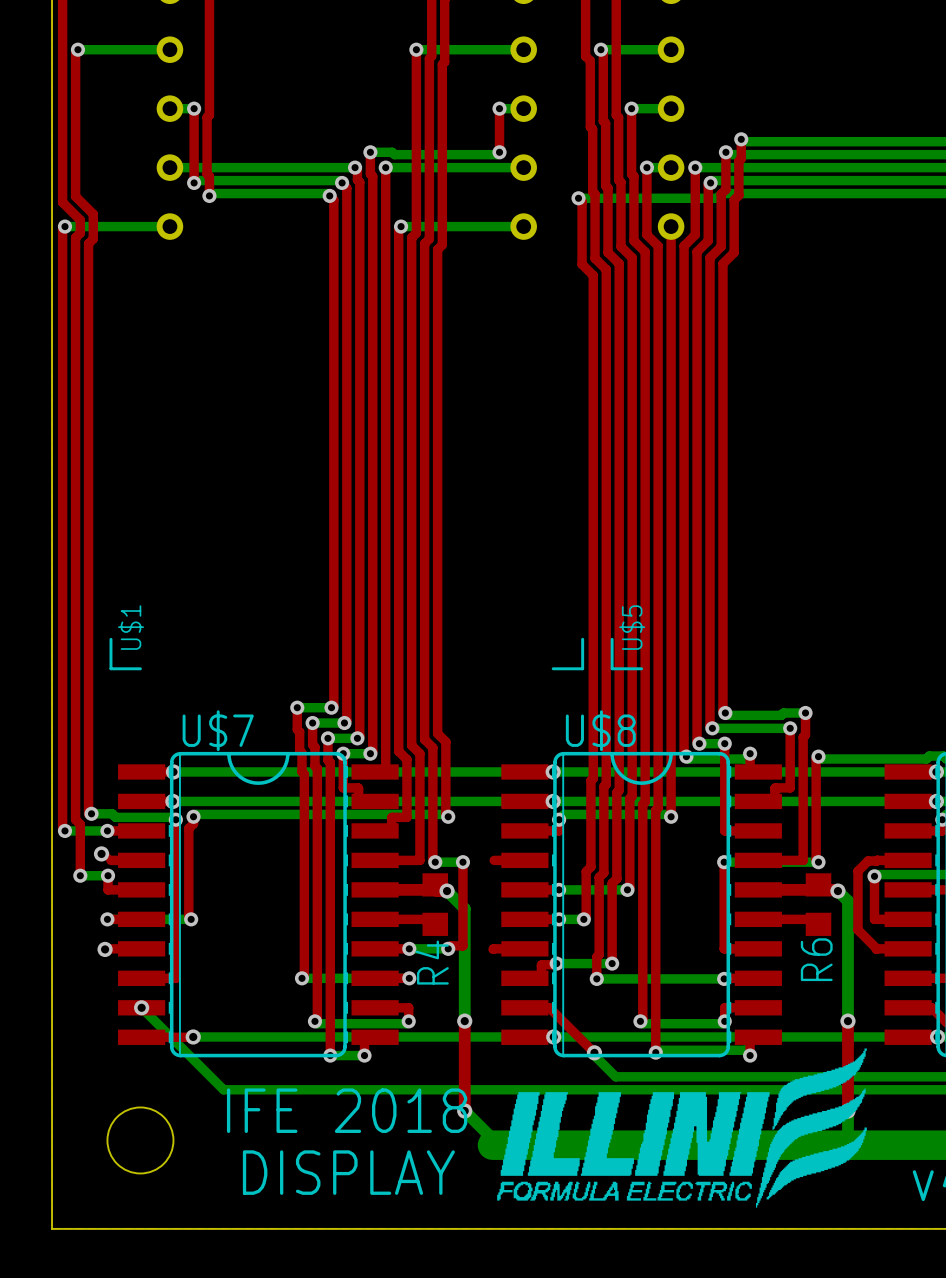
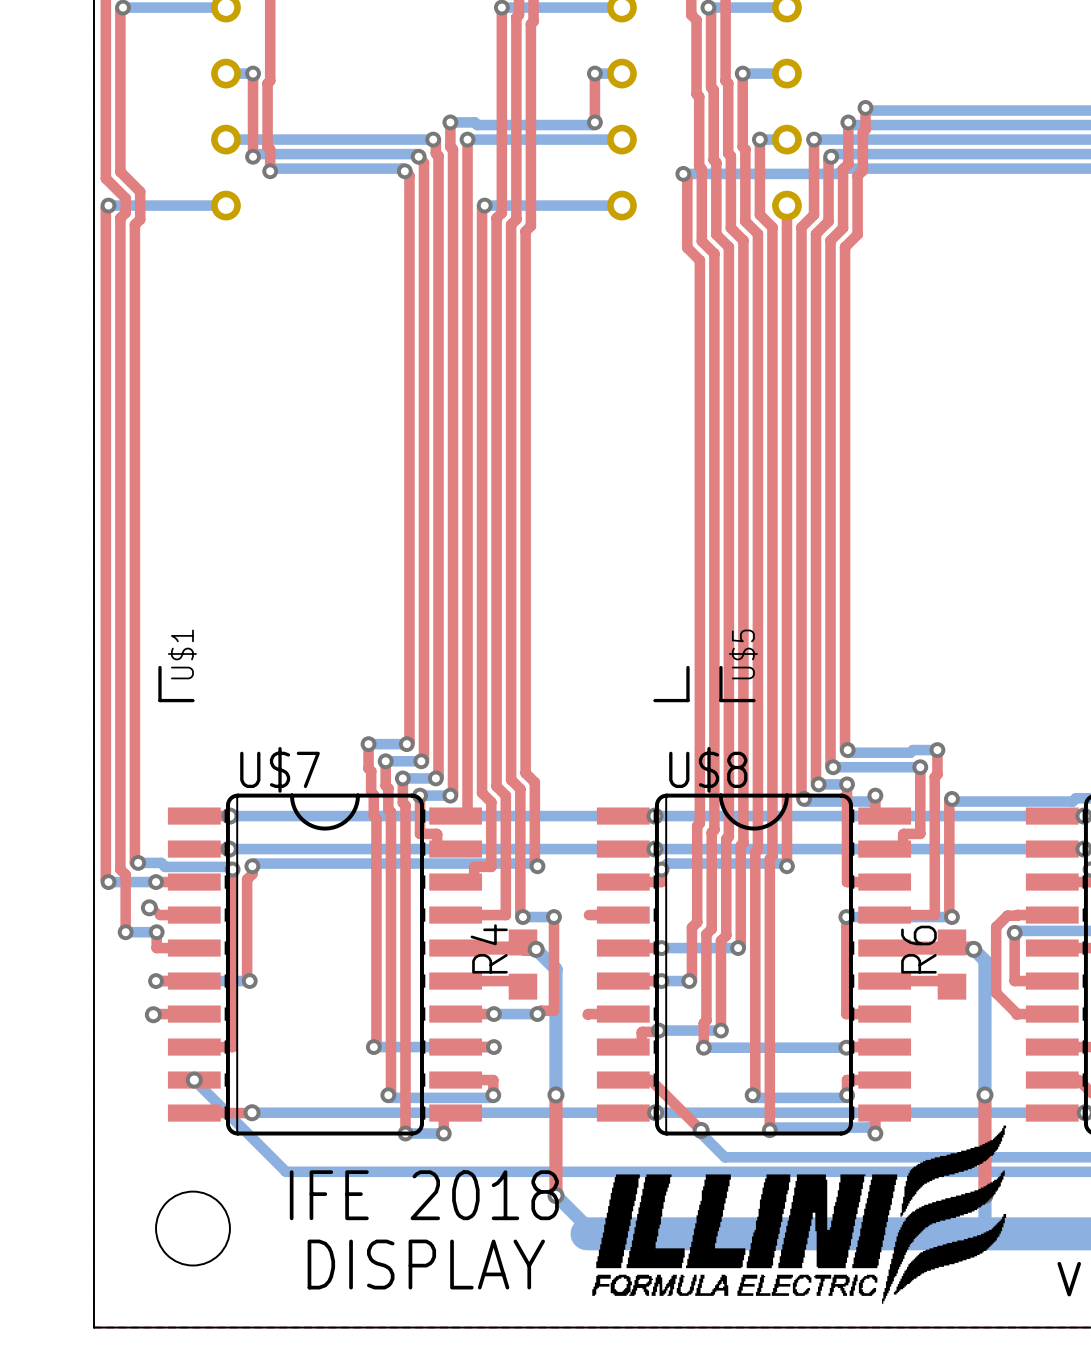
R6 name position: R6 (816, 959) -> R6 (918, 949)
R4 name position: R4 (432, 962) -> R4 (489, 948)

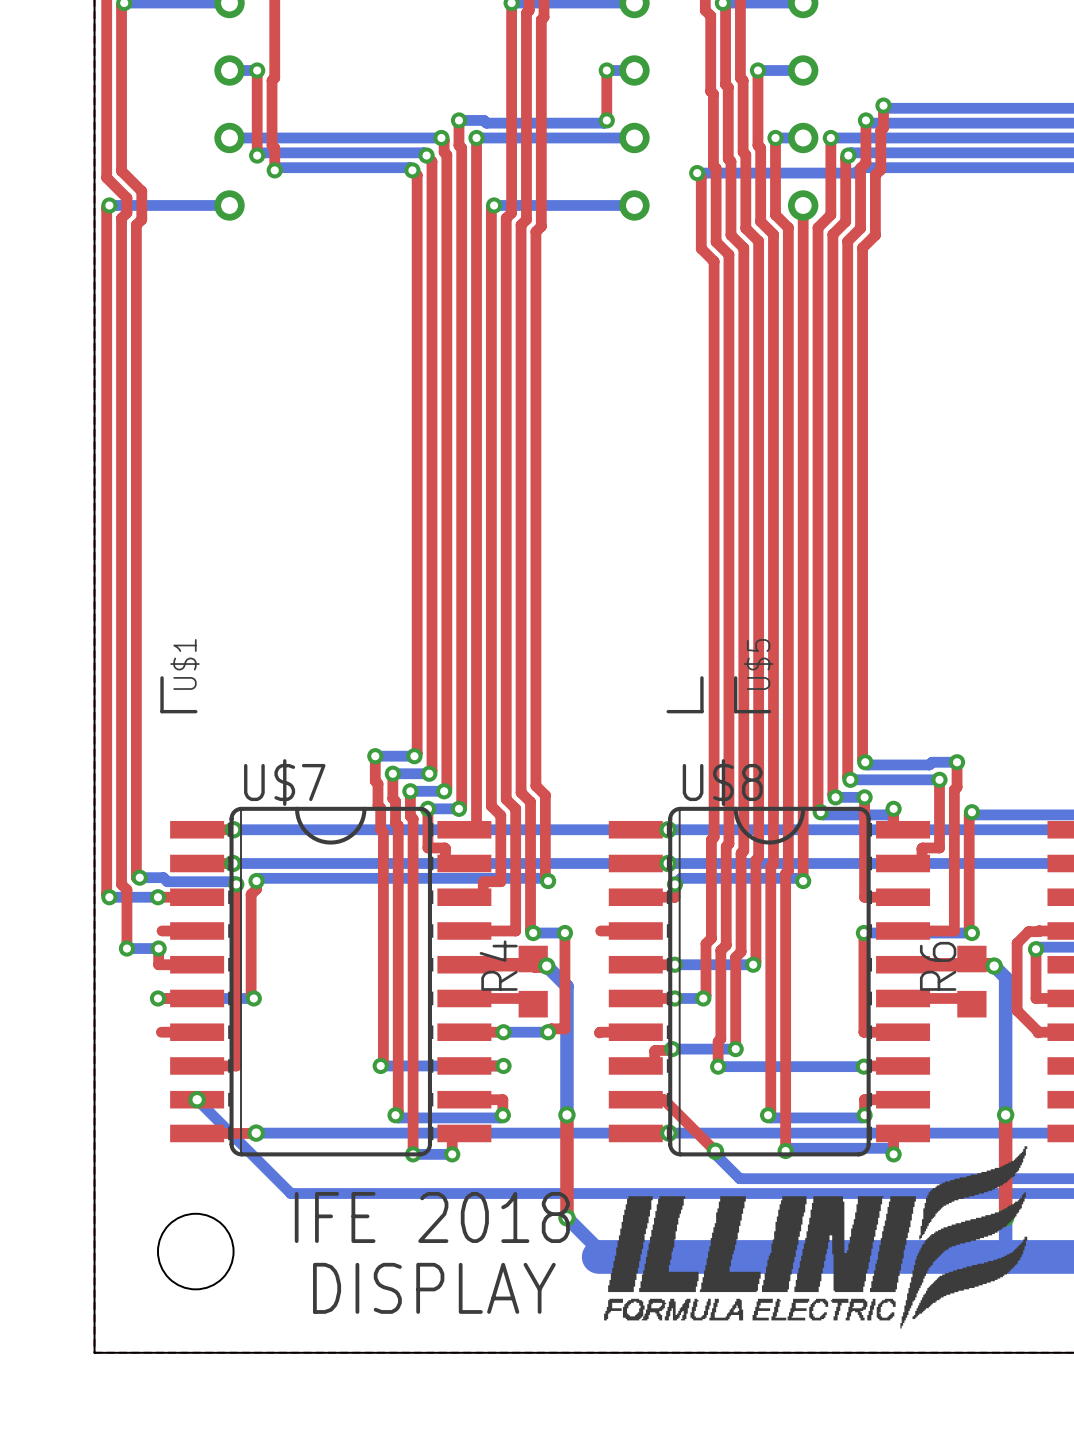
via: (149, 907) -> none
via: (153, 1014) -> none

